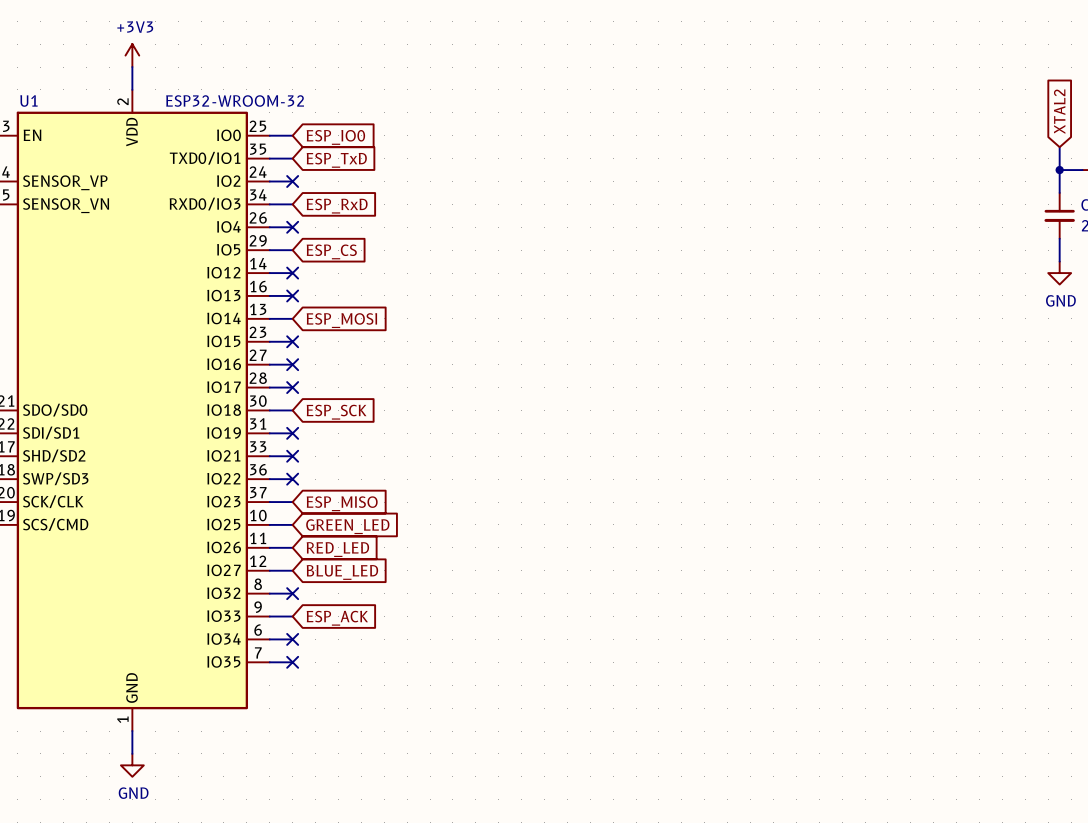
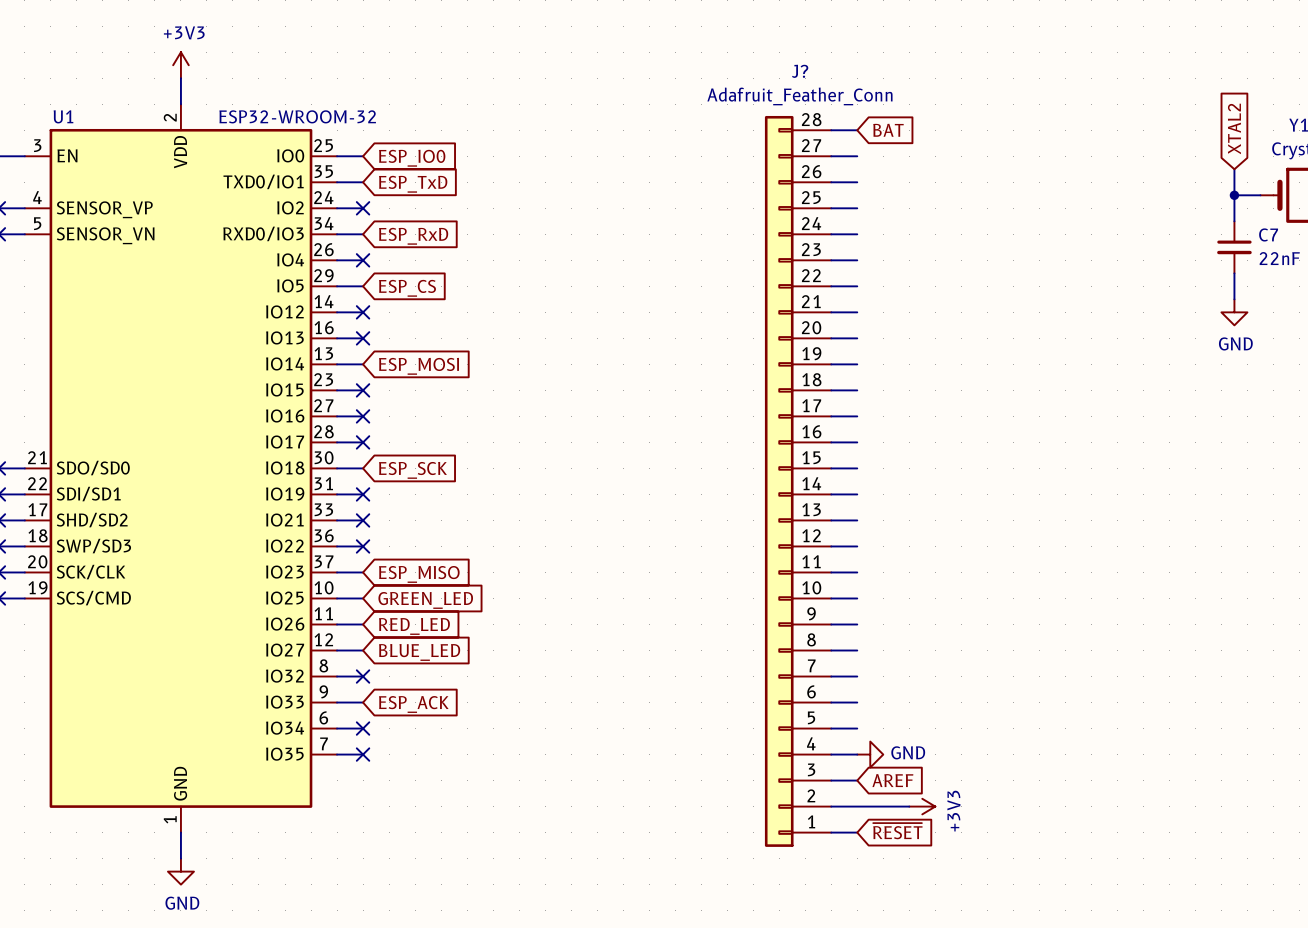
wire: none -> (831, 130) (857, 130)
global label: none -> BAT (888, 130)
wire: none -> (831, 156) (857, 156)
wire: none -> (831, 182) (857, 182)
wire: none -> (831, 208) (857, 208)
wire: none -> (831, 234) (857, 234)
wire: none -> (831, 260) (857, 260)
wire: none -> (831, 286) (857, 286)
wire: none -> (831, 312) (857, 312)
wire: none -> (831, 338) (857, 338)
wire: none -> (831, 364) (857, 364)
wire: none -> (831, 390) (857, 390)
wire: none -> (831, 416) (857, 416)
wire: none -> (831, 442) (857, 442)
wire: none -> (831, 468) (857, 468)
J?: none -> Adafruit_Feather_Conn (798, 481)
wire: none -> (831, 494) (857, 494)
wire: none -> (831, 520) (857, 520)
wire: none -> (831, 546) (857, 546)
wire: none -> (831, 572) (857, 572)
wire: none -> (831, 598) (857, 598)
wire: none -> (831, 624) (857, 624)
wire: none -> (831, 650) (857, 650)
wire: none -> (831, 676) (857, 676)
wire: none -> (831, 702) (857, 702)
wire: none -> (831, 728) (857, 728)
wire: none -> (831, 754) (857, 754)
power symbol: none -> GND (870, 754)
wire: none -> (831, 780) (857, 780)
global label: none -> AREF (892, 780)
wire: none -> (831, 806) (909, 806)
power symbol: none -> +3V3 (922, 806)
global label: none -> ~{RESET} (897, 831)
wire: none -> (831, 832) (857, 832)

